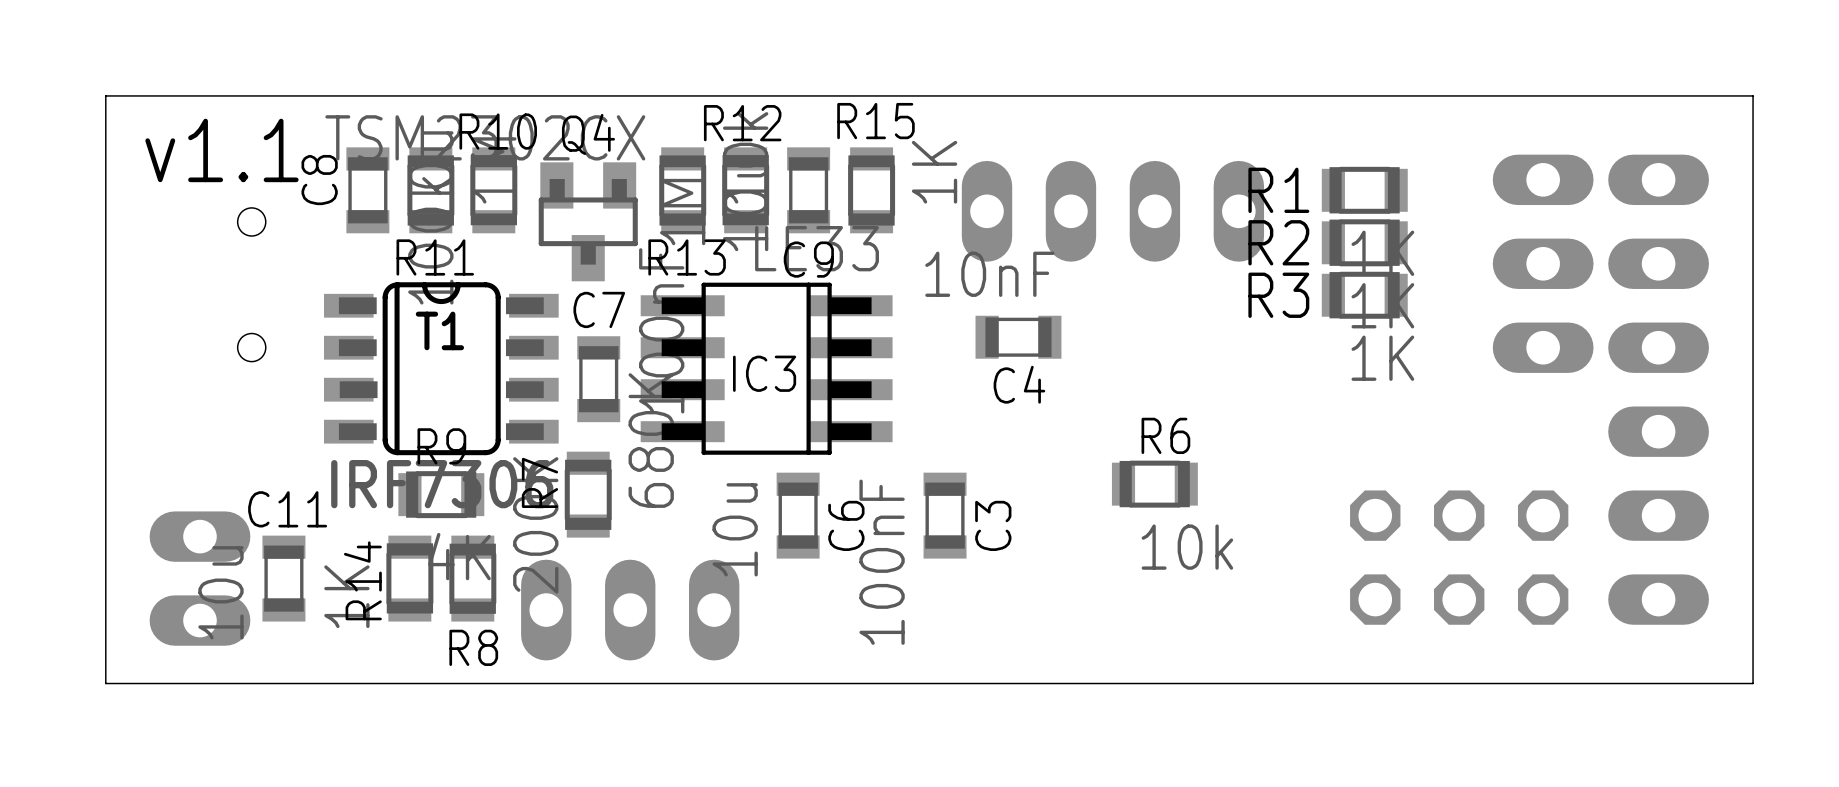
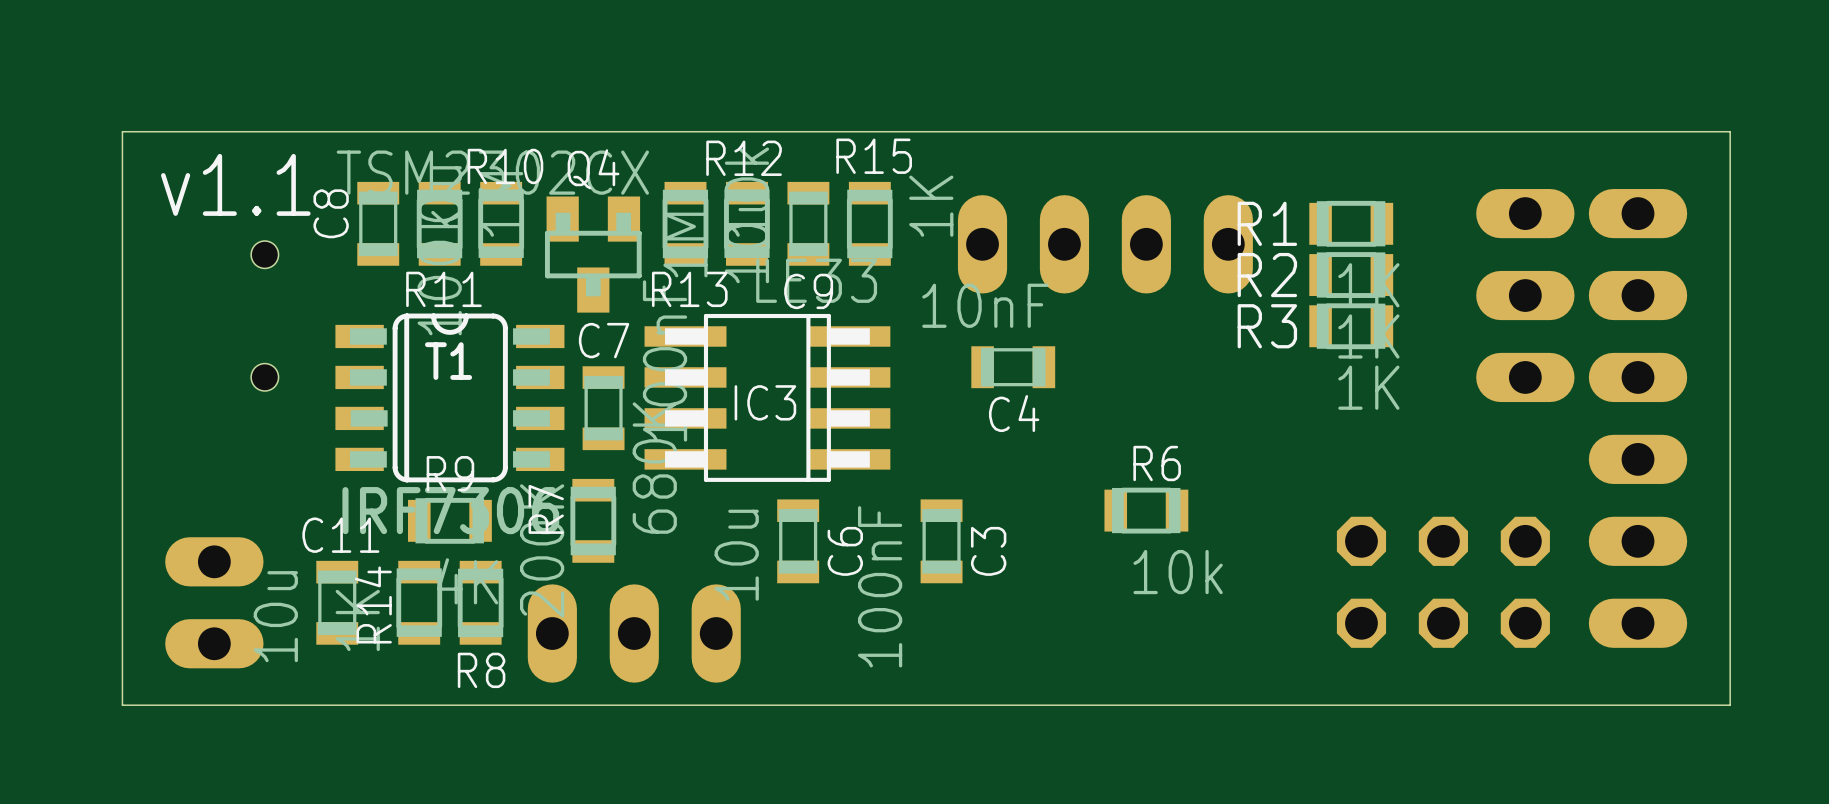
C11 position: (283, 578) -> (337, 602)

